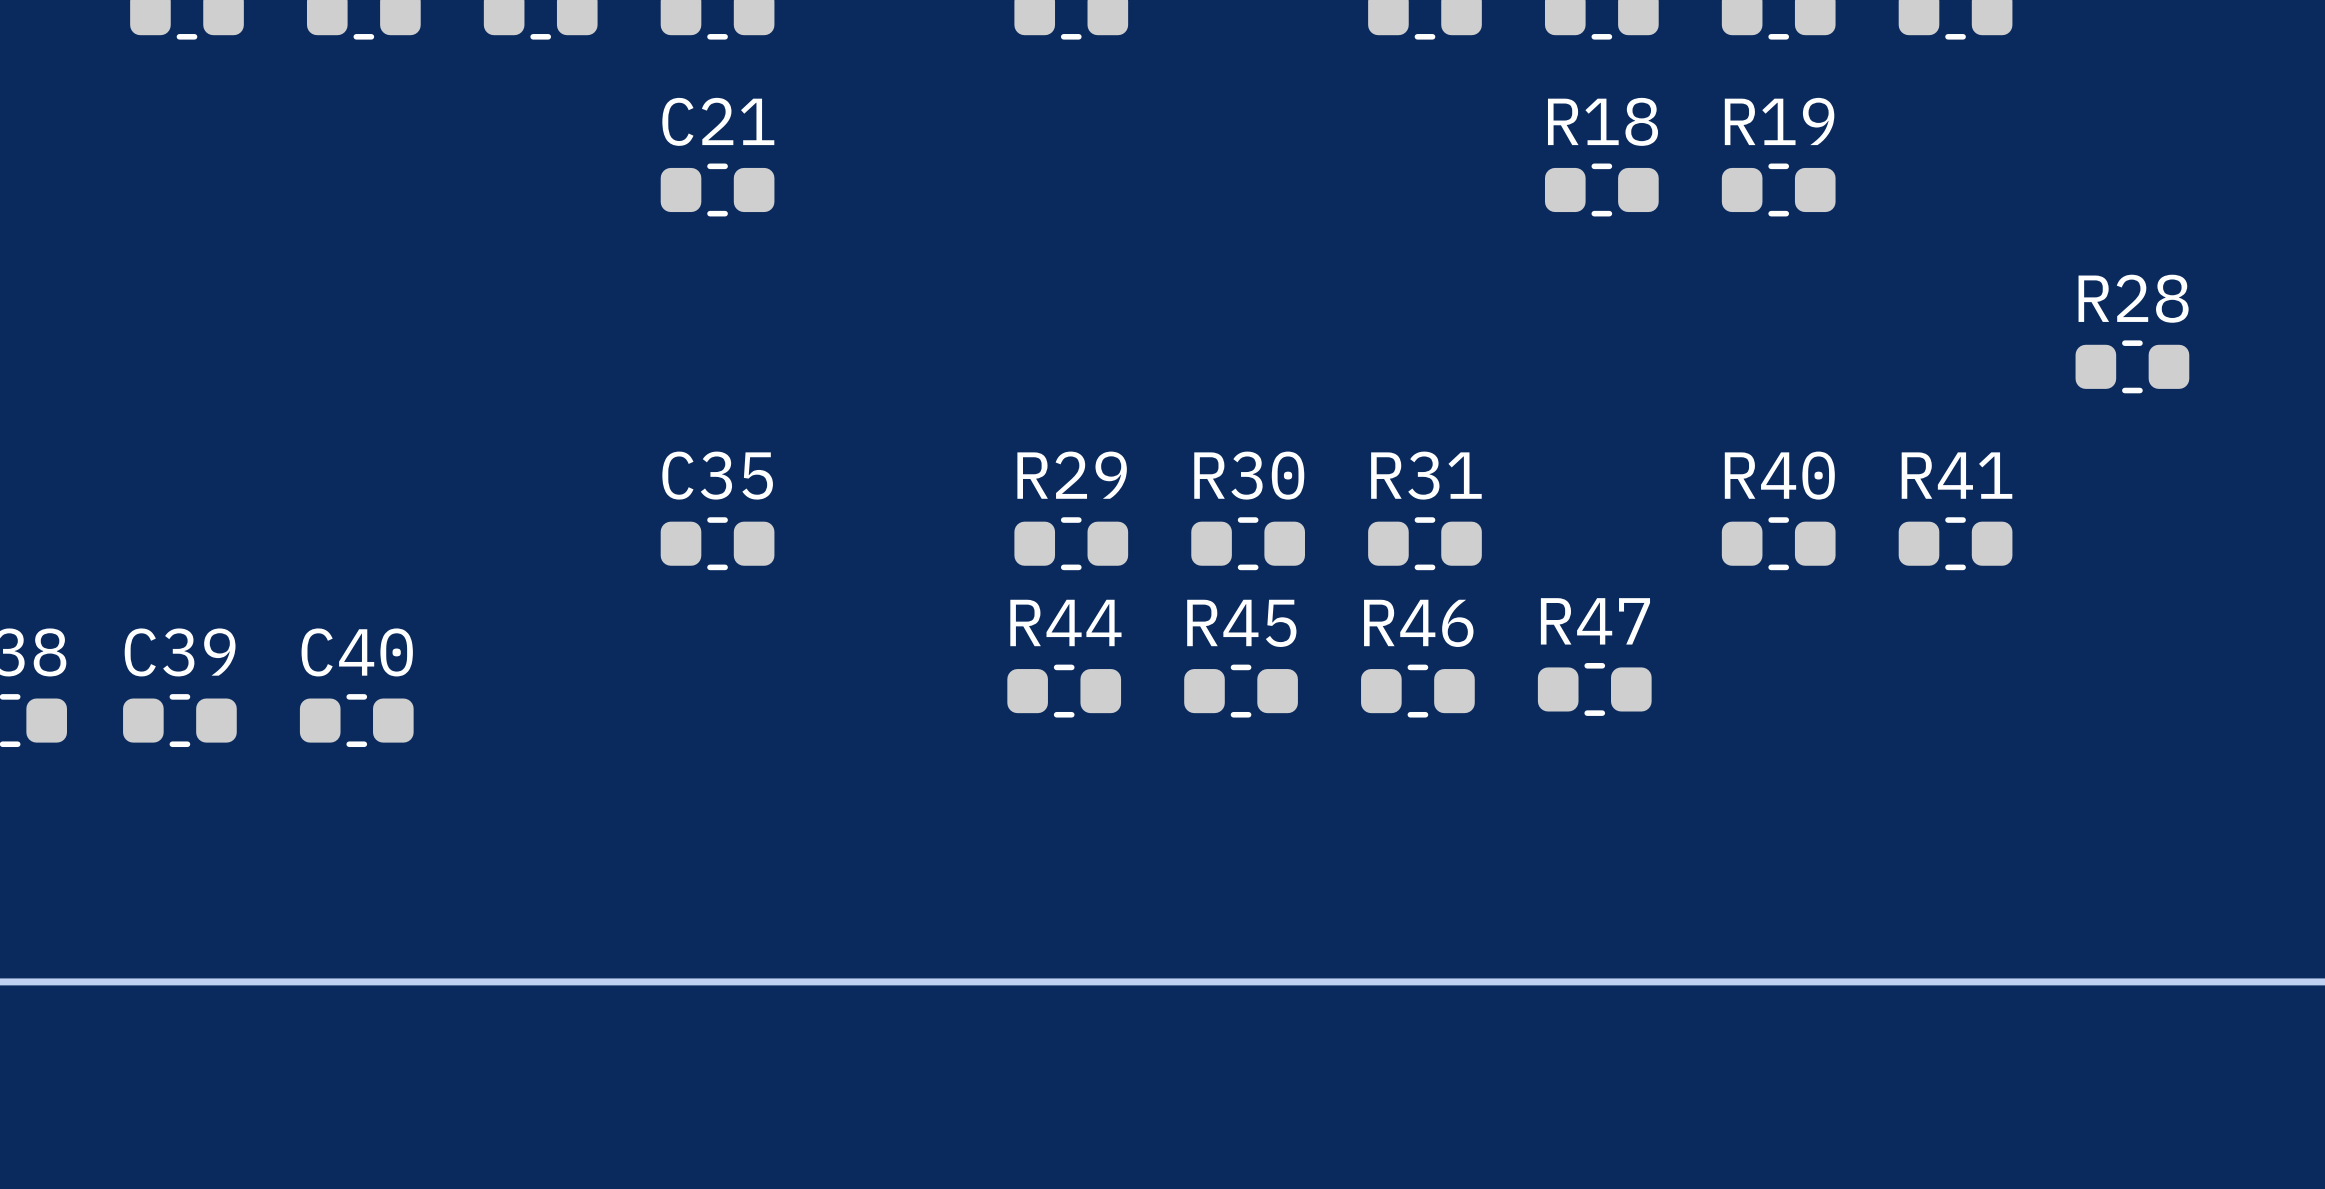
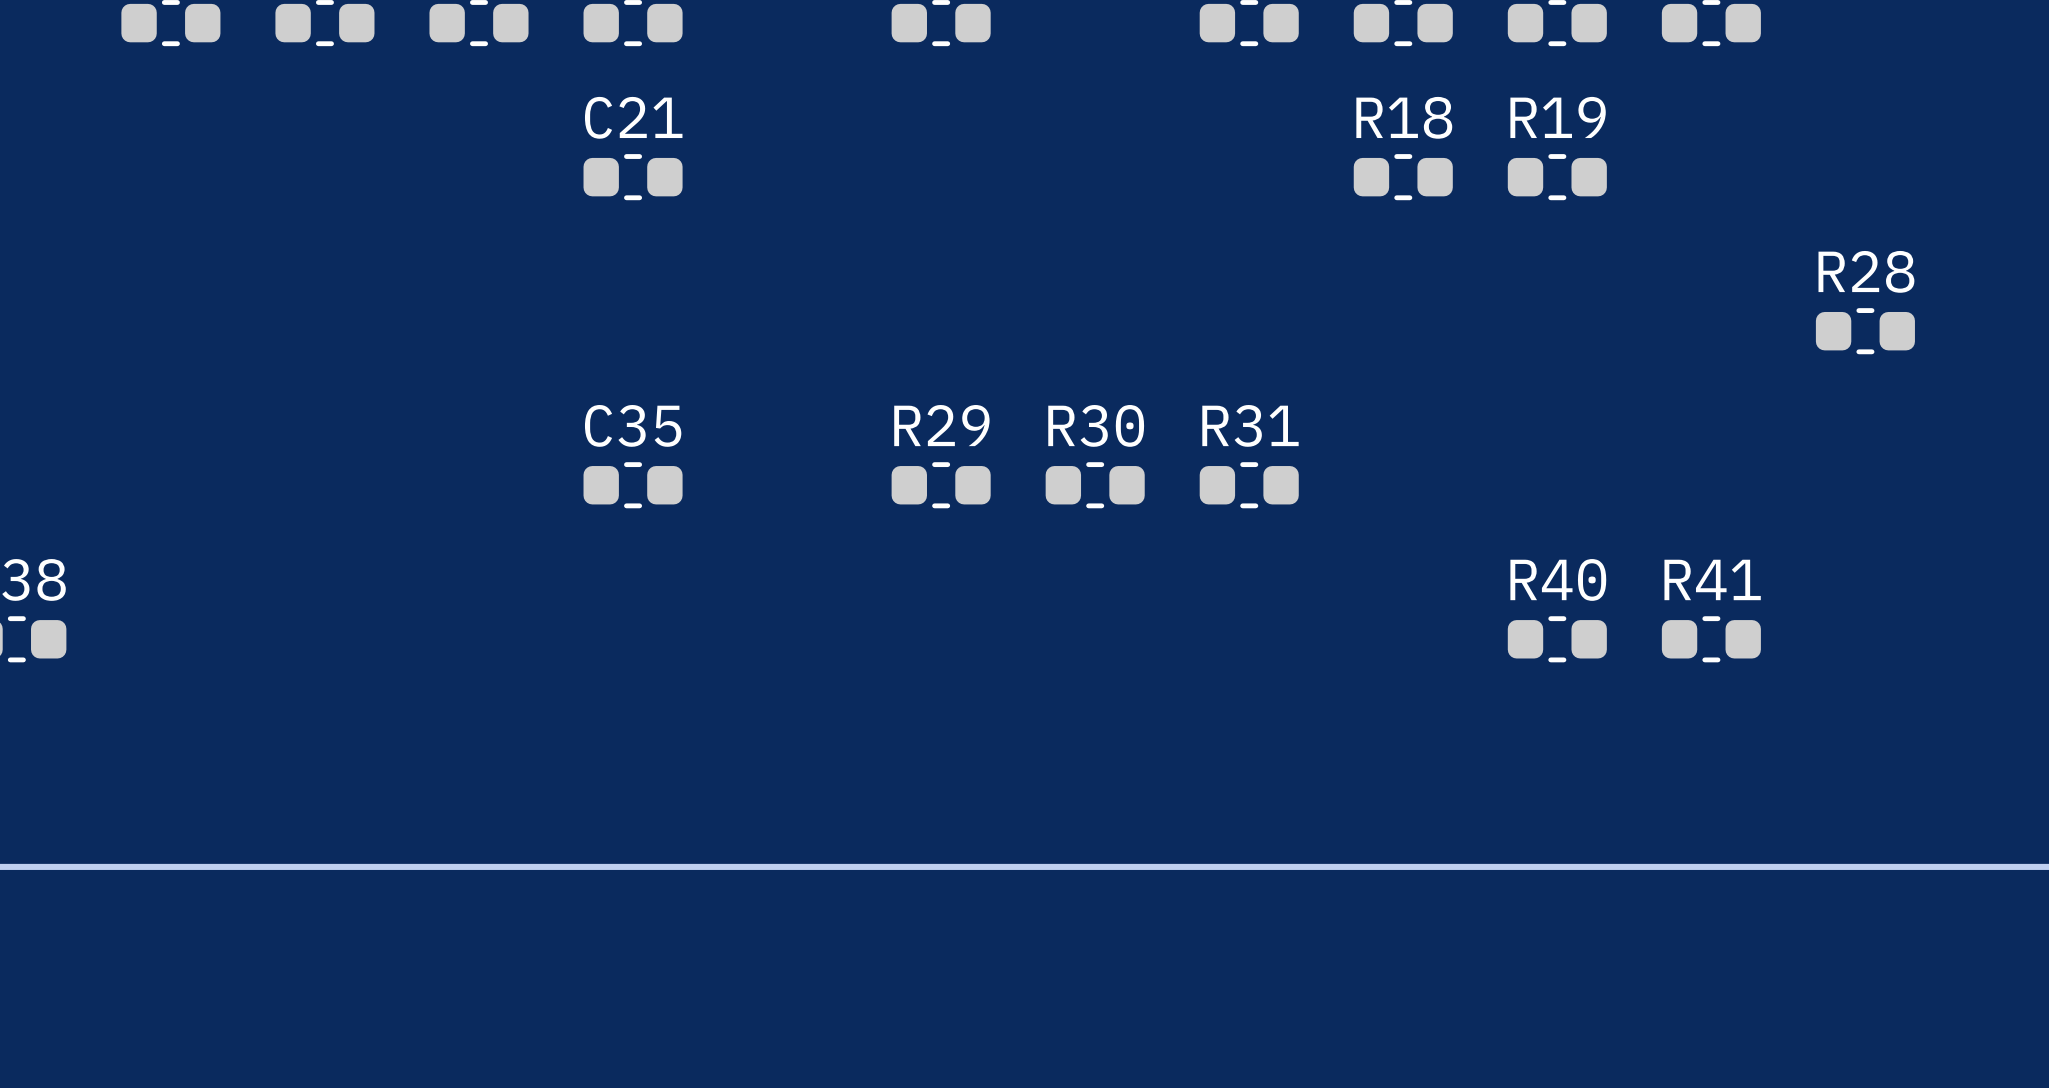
R40 position: (1778, 543) -> (1557, 639)
R41 position: (1955, 543) -> (1711, 639)
R47: (1594, 689) -> none
R44: (1064, 691) -> none
R45: (1241, 691) -> none
R46: (1417, 691) -> none
C39: (179, 720) -> none
C40: (356, 720) -> none

